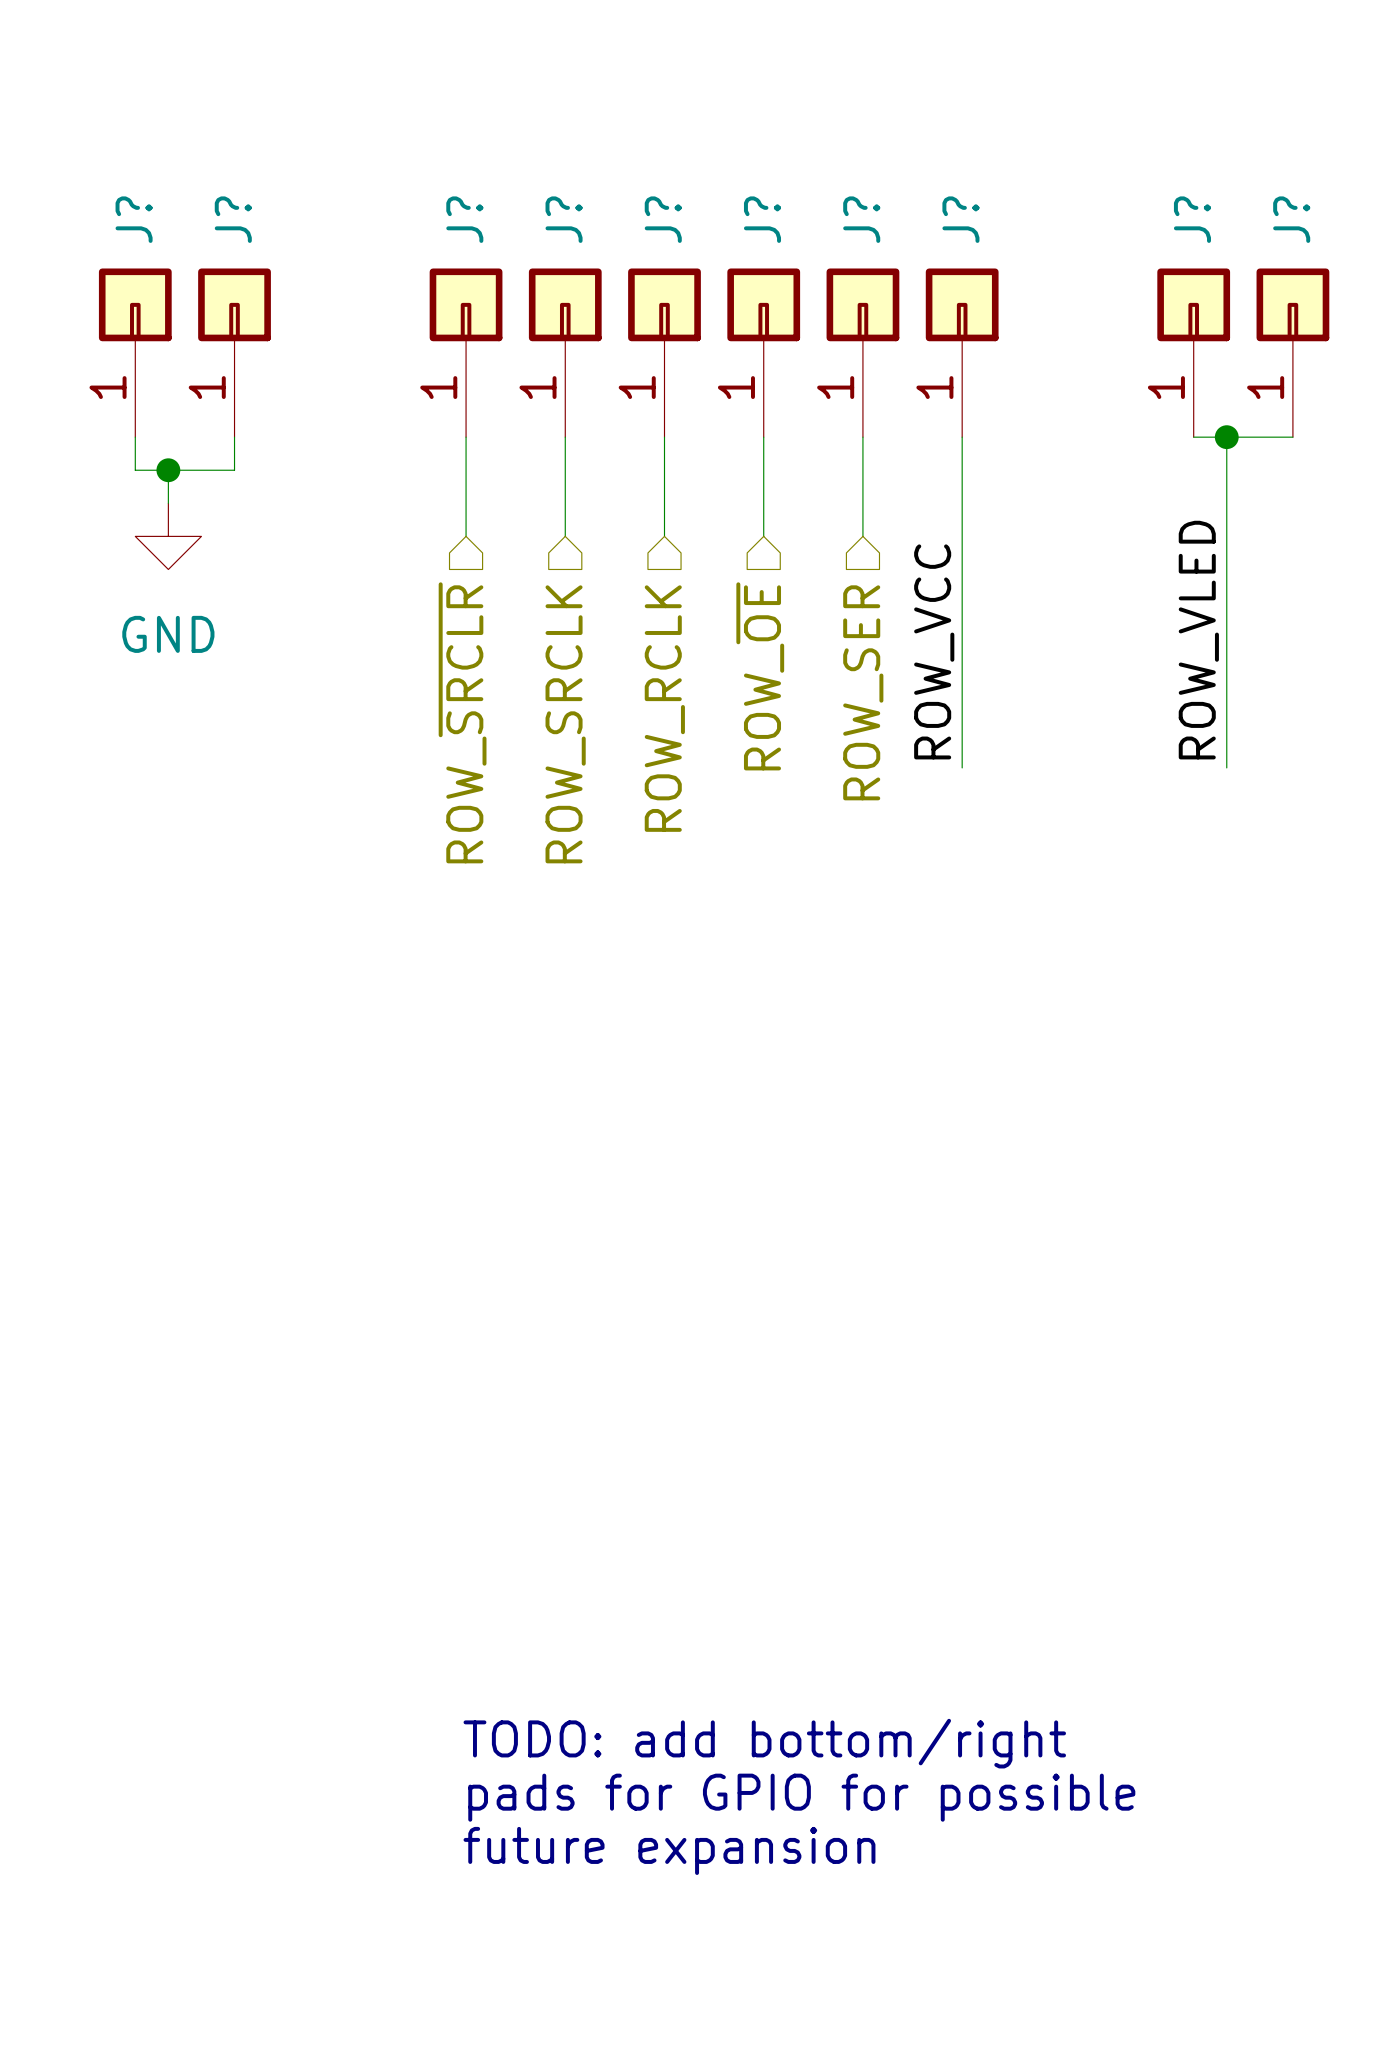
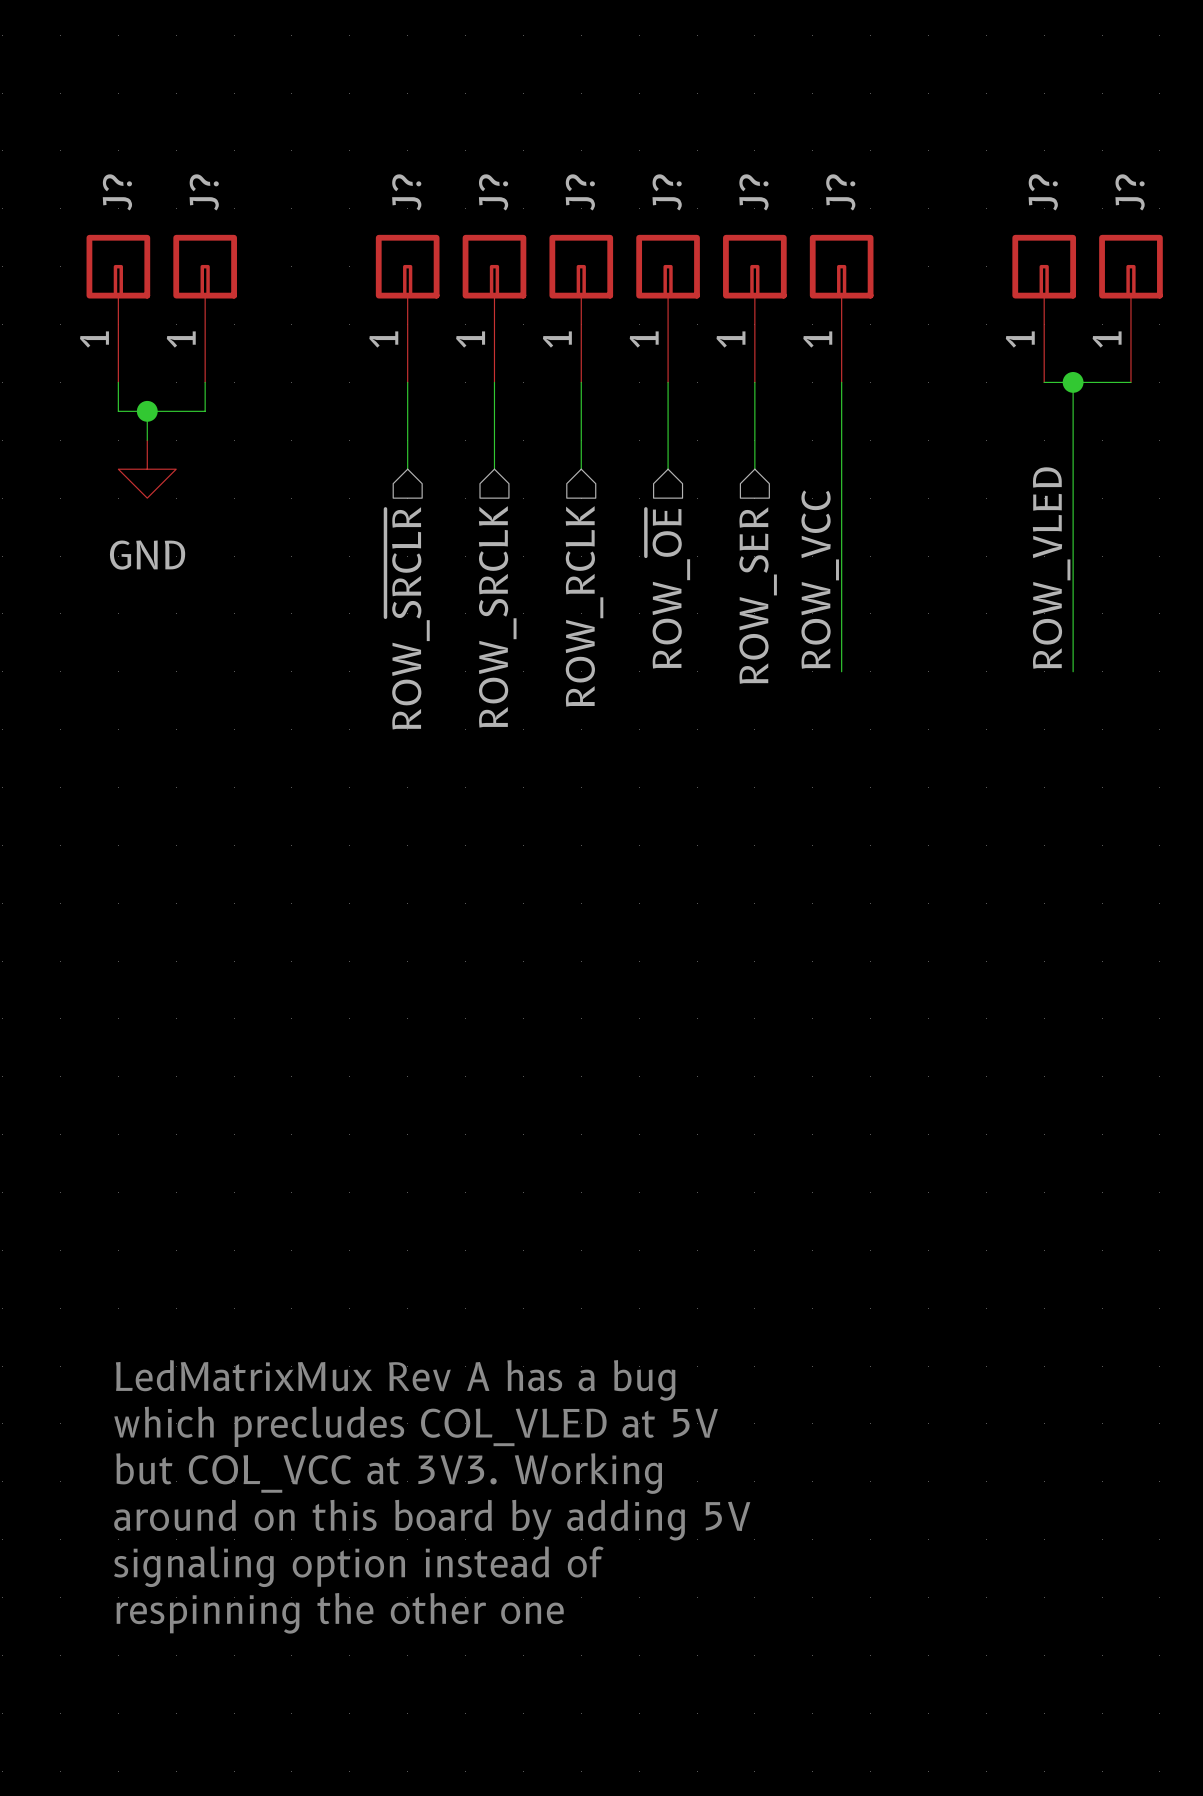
text: none -> LedMatrixMux Rev A has a bug (395, 1380)
text: none -> which precludes COL_VLED at 5V (416, 1426)
text: none -> but COL_VCC at 3V3. Working (389, 1473)
text: none -> around on this board by adding 5V (432, 1520)
text: TODO: add bottom/right (764, 1743) -> none
text: none -> signaling option instead of (358, 1566)
text: pads for GPIO for possible (801, 1797) -> none
text: none -> respinning the other one (340, 1613)
text: future expansion (669, 1850) -> none

